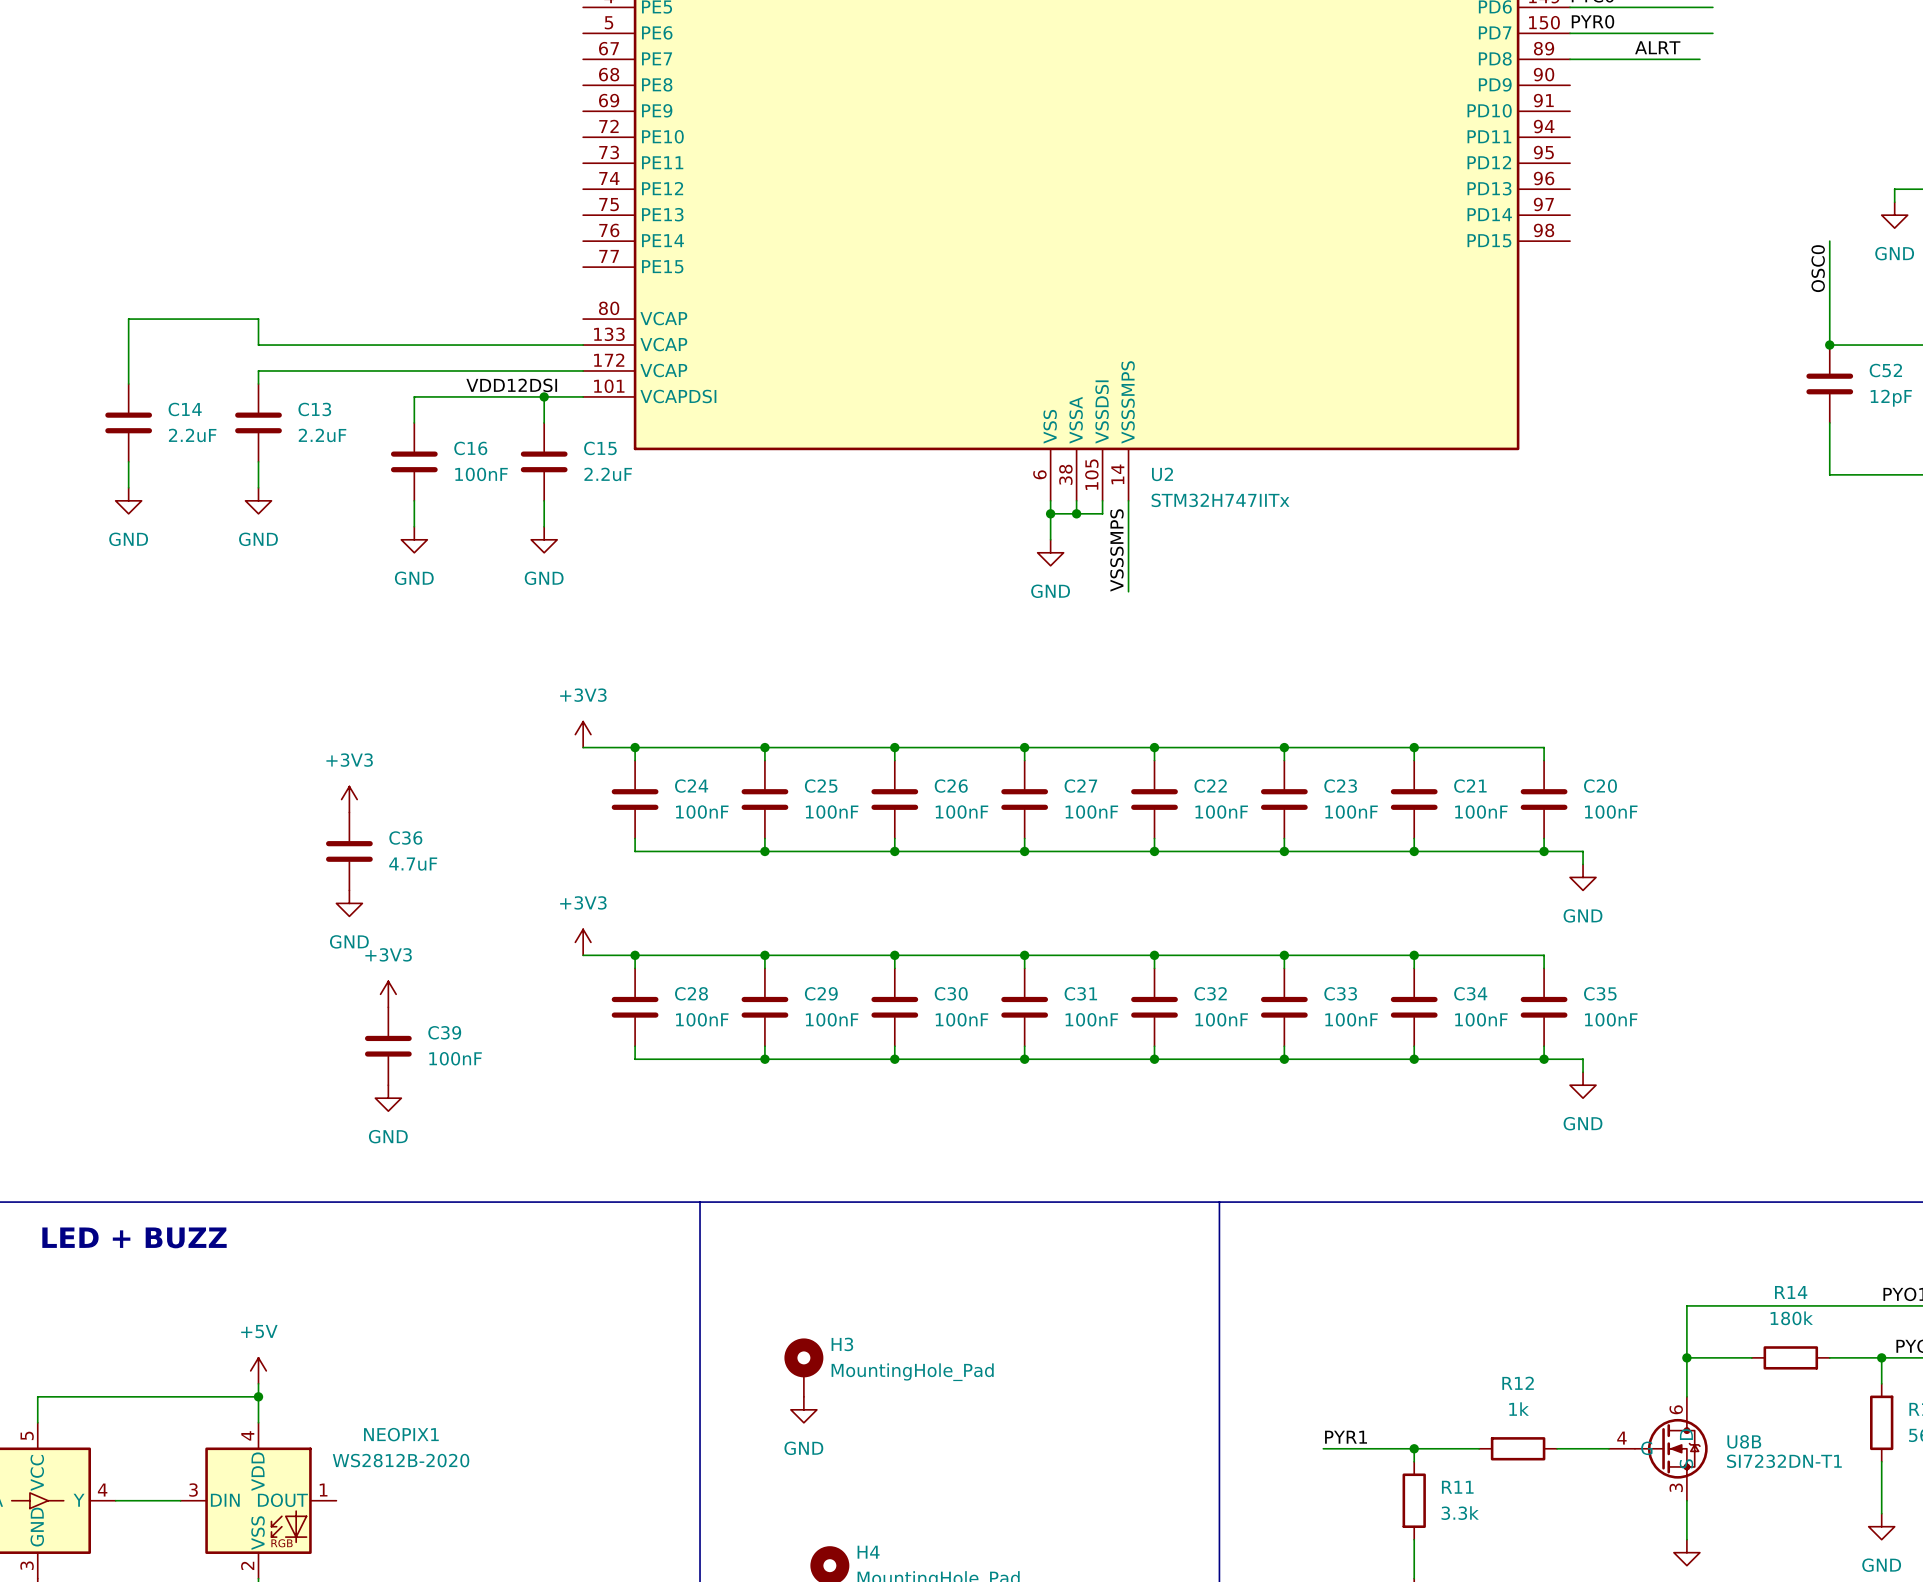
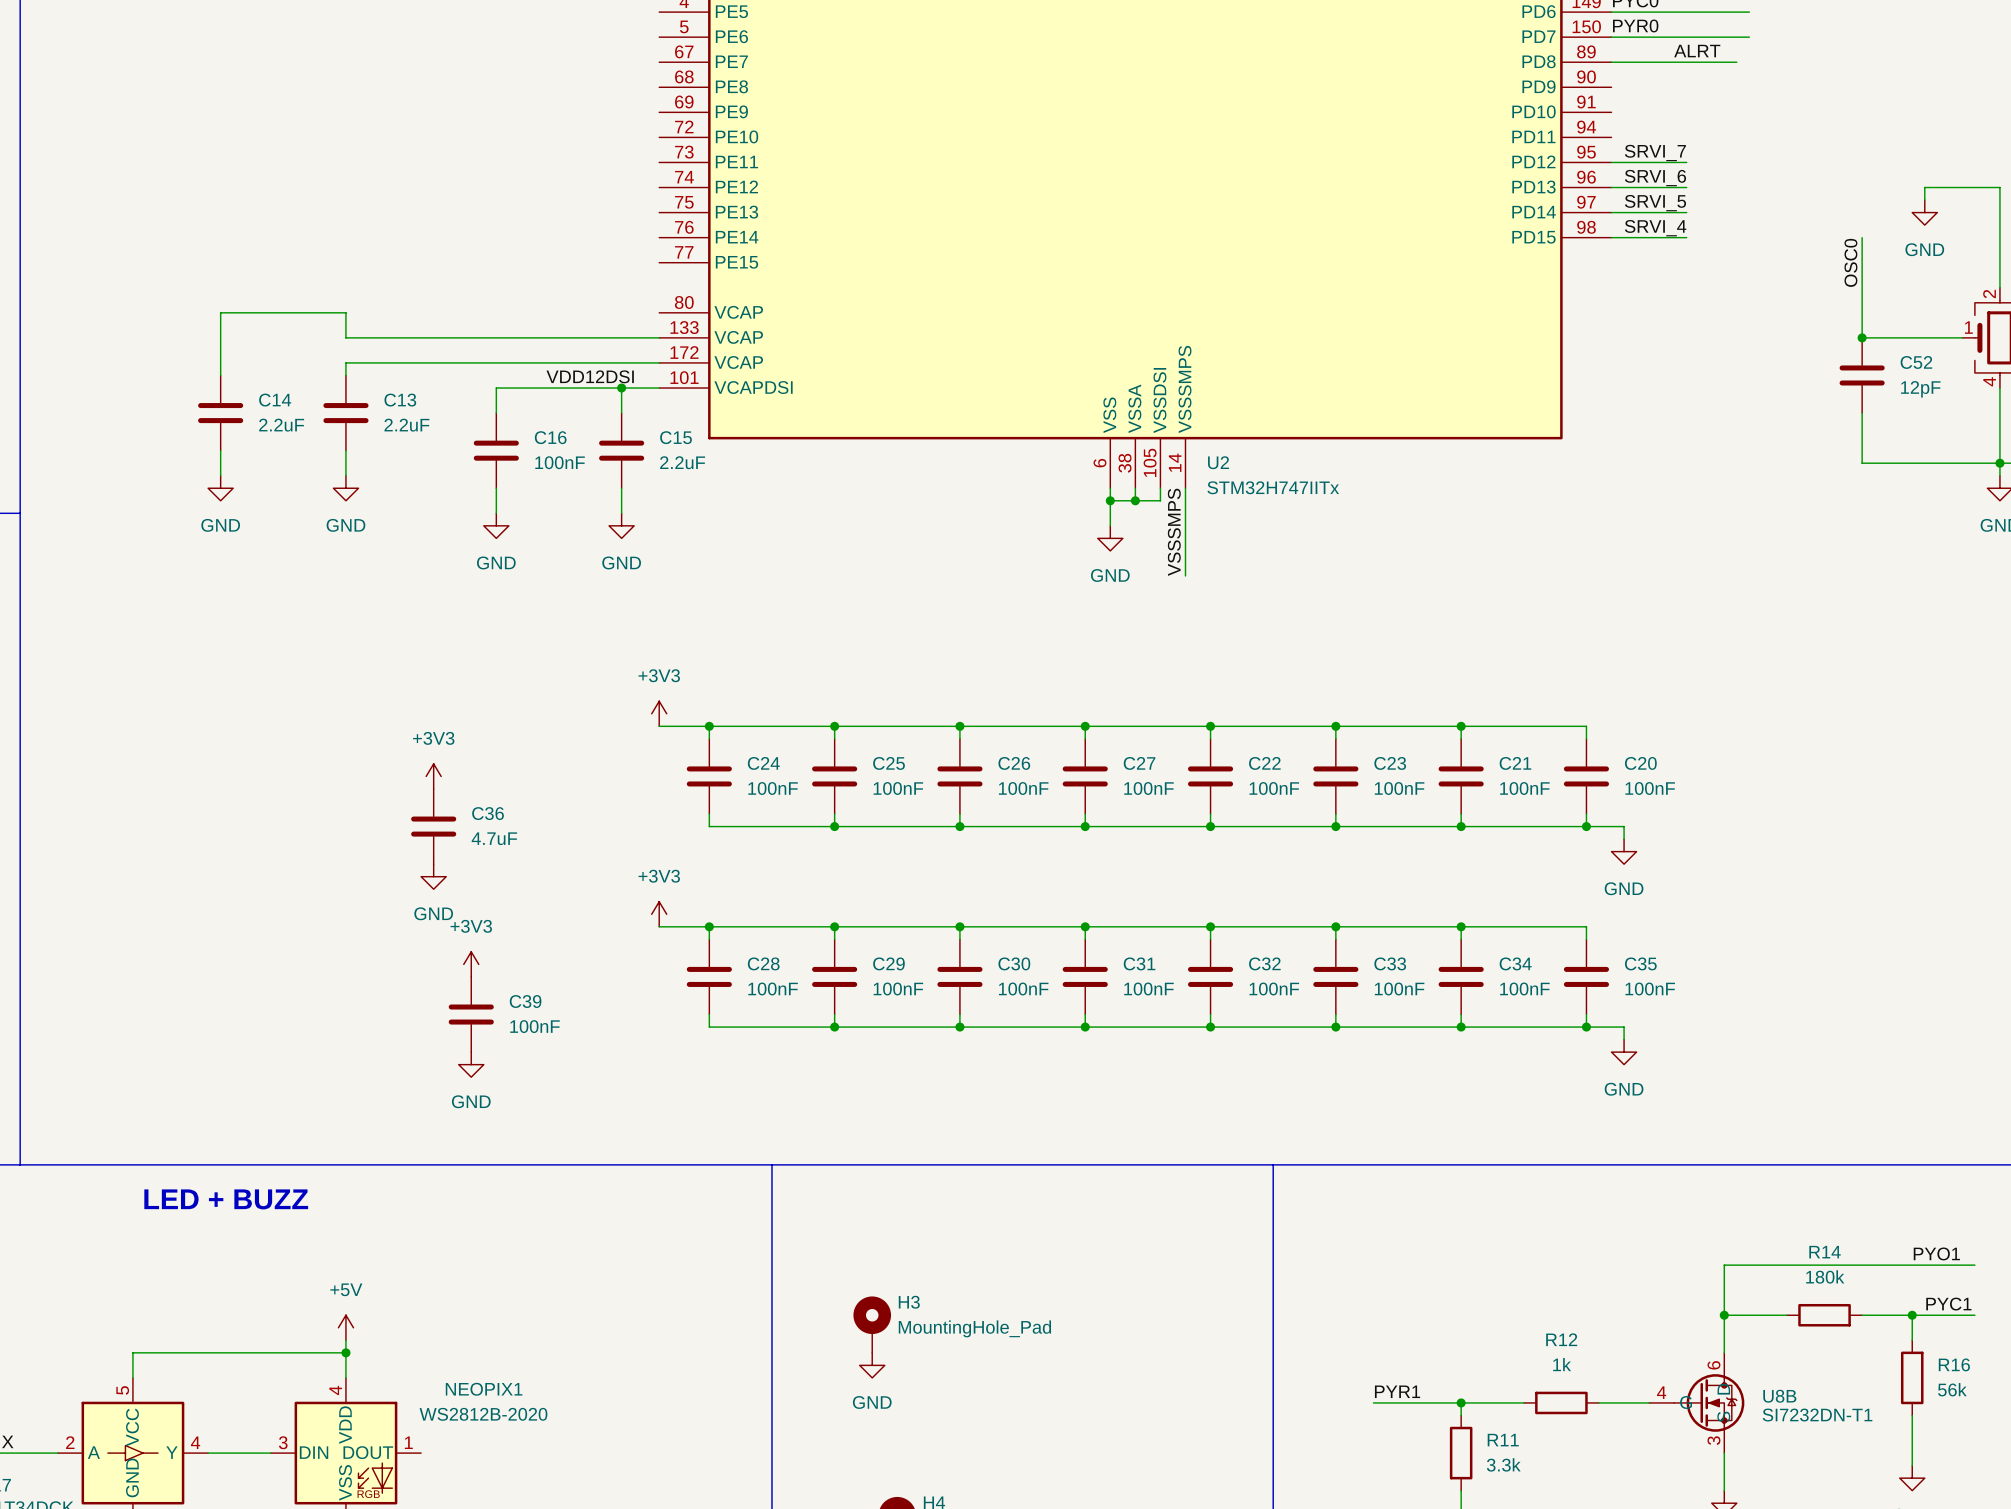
label: none -> SRVI_7 (1655, 153)
wire: none -> (1611, 162) (1686, 162)
label: none -> SRVI_6 (1655, 178)
wire: none -> (1611, 187) (1686, 187)
label: none -> SRVI_5 (1655, 203)
wire: none -> (1611, 212) (1686, 212)
label: none -> SRVI_4 (1655, 228)
wire: none -> (1611, 237) (1686, 237)

